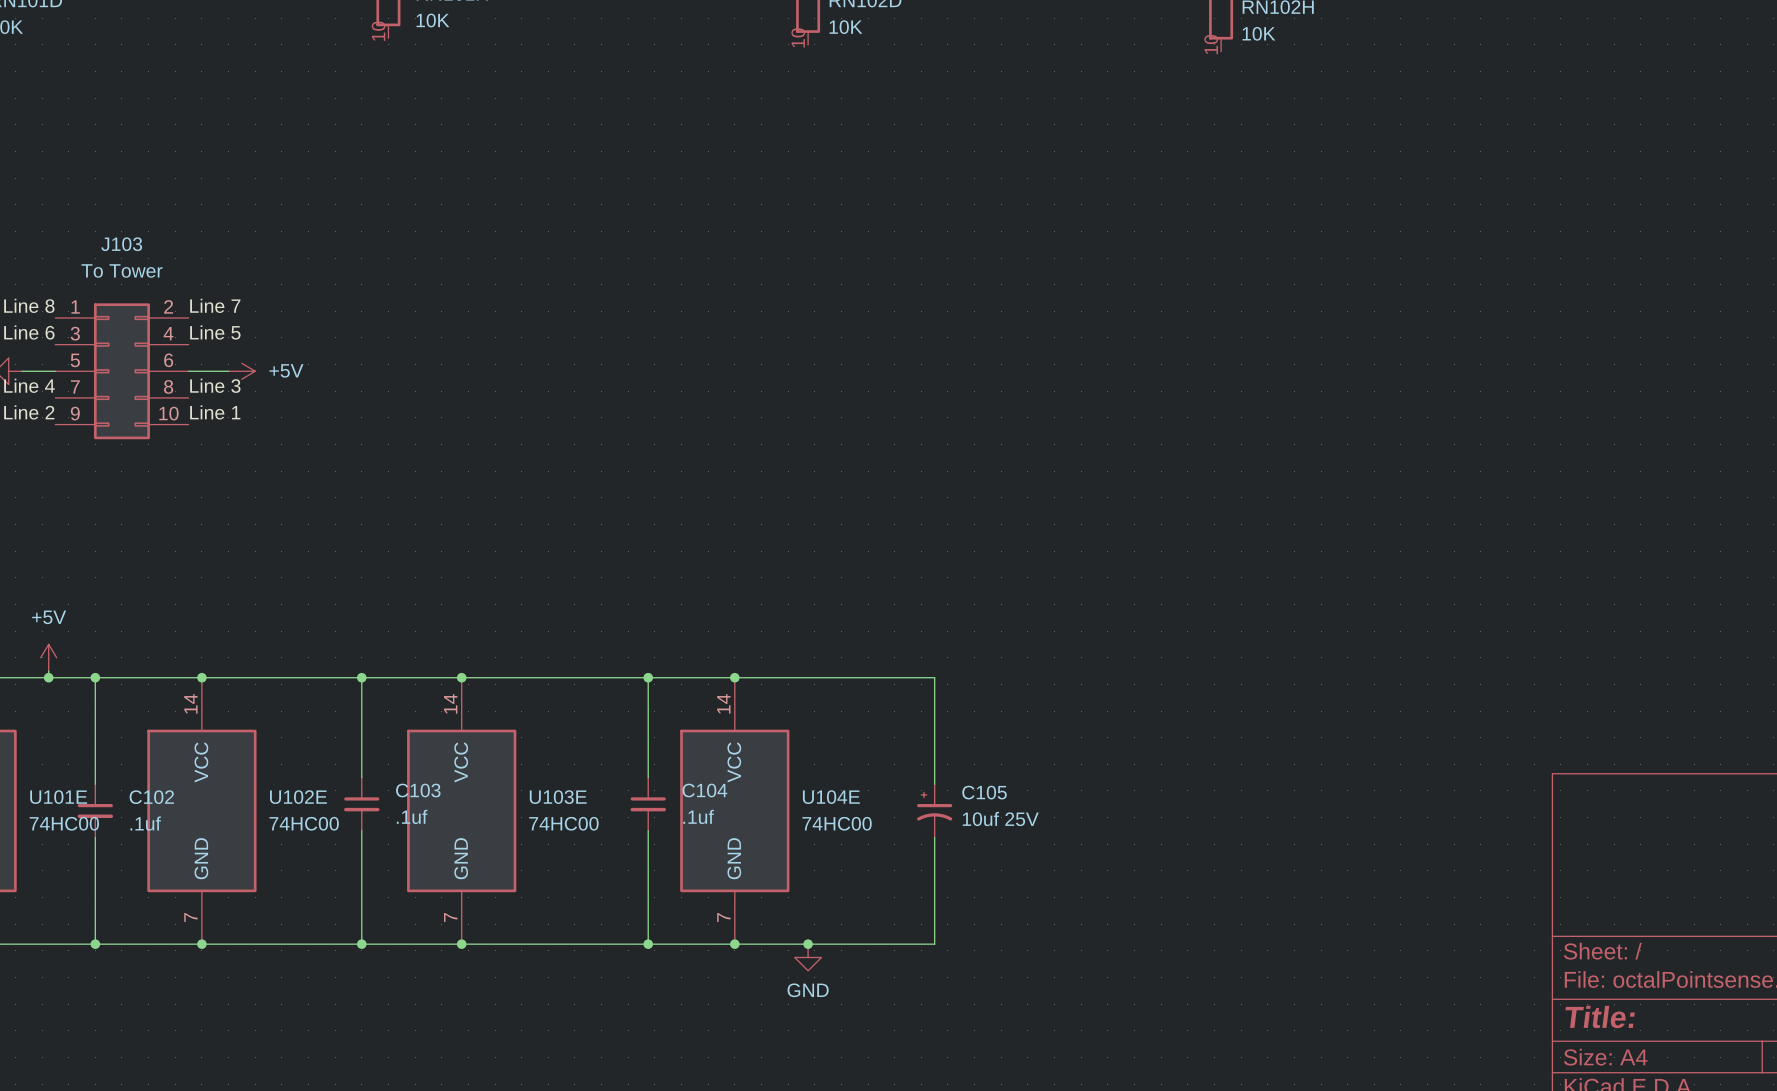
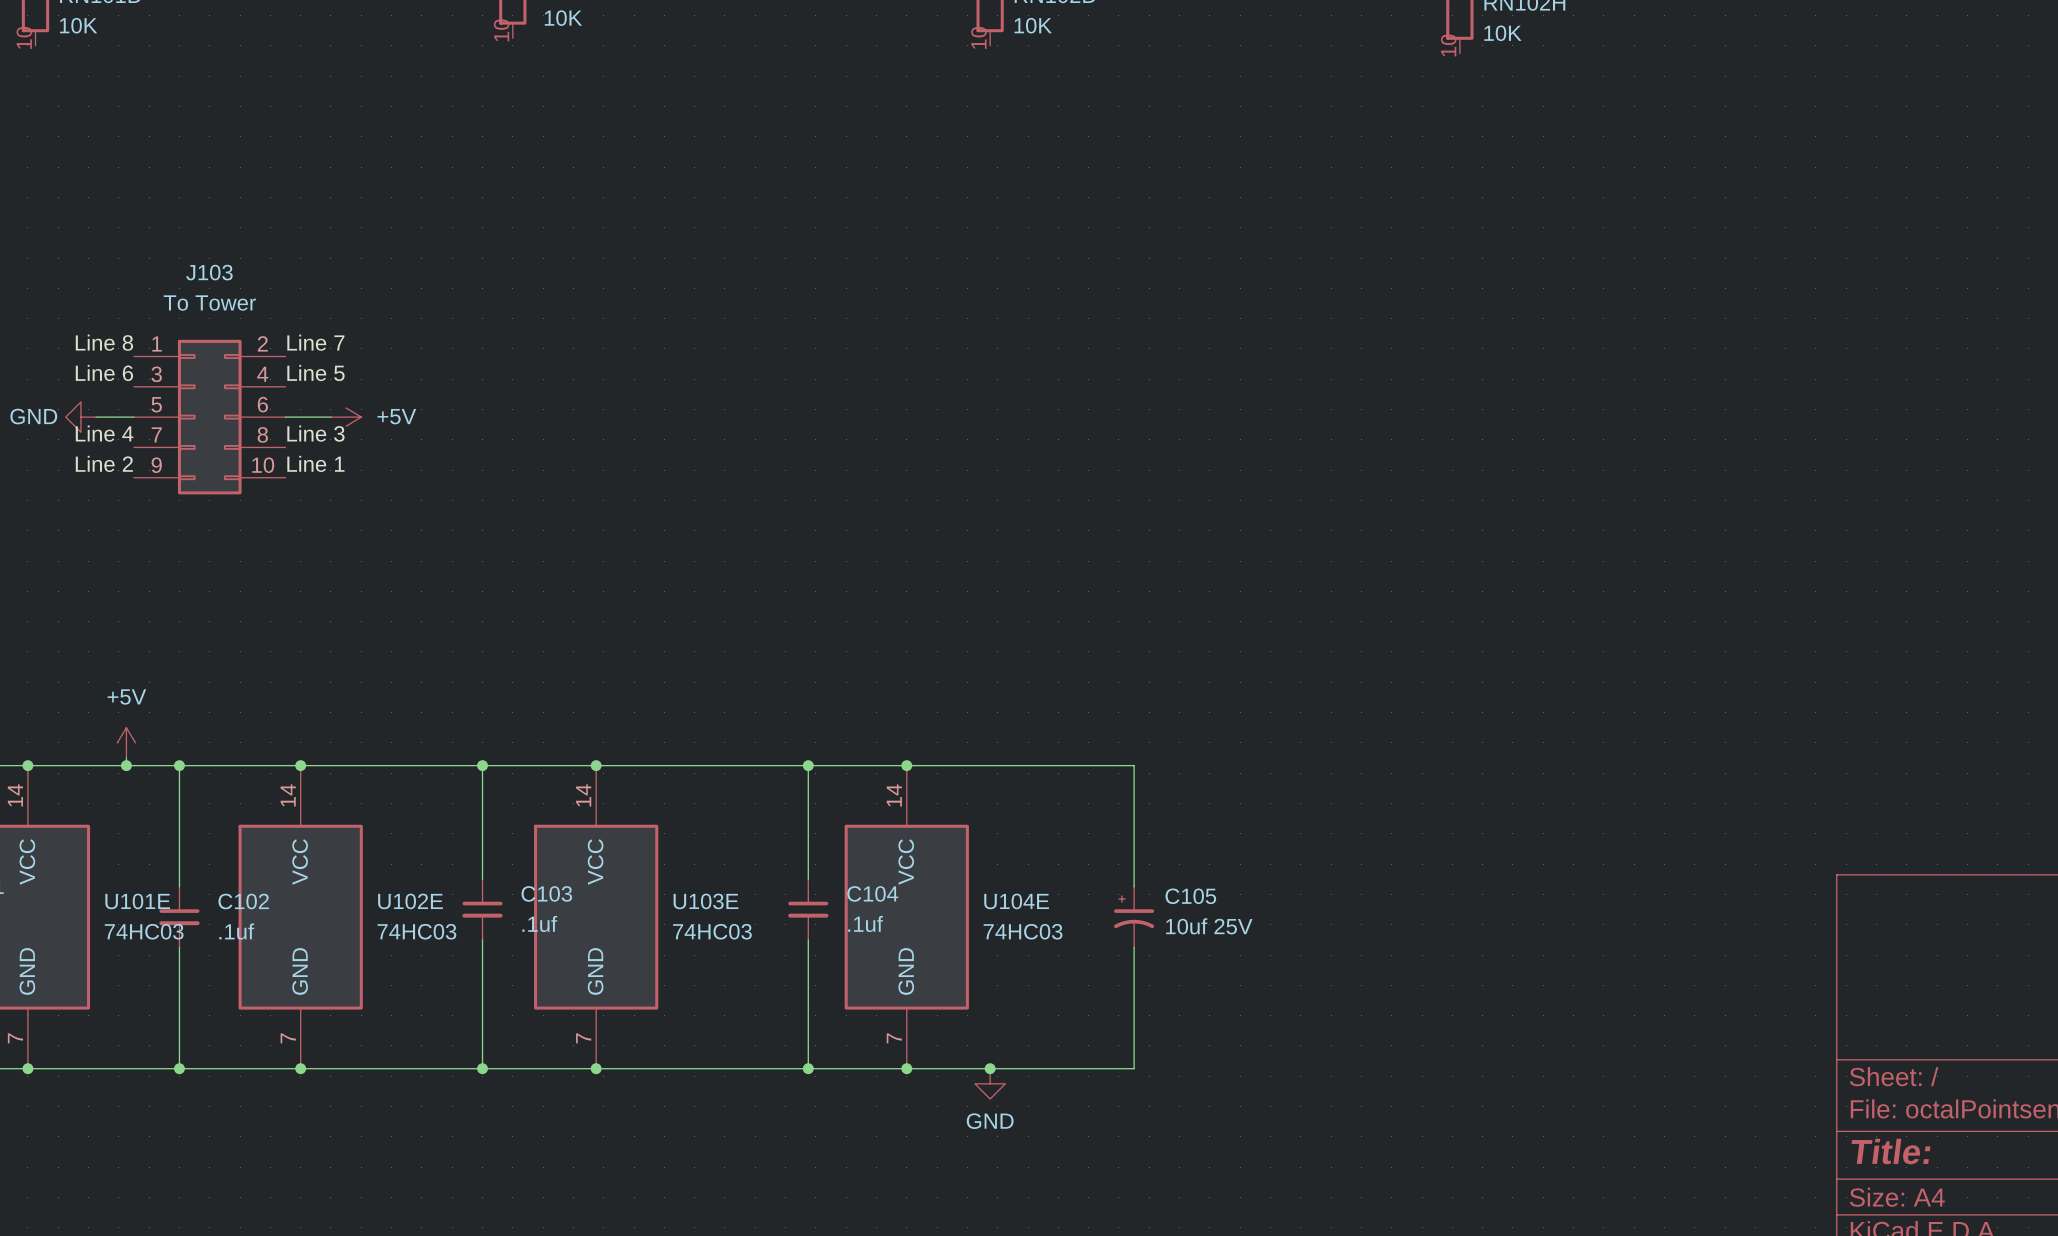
U101E value: 74HC00 (64, 823) -> 74HC03 (144, 931)
U102E value: 74HC00 (304, 823) -> 74HC03 (416, 931)
U103E value: 74HC00 (563, 823) -> 74HC03 (712, 931)
U104E value: 74HC00 (837, 823) -> 74HC03 (1023, 931)

